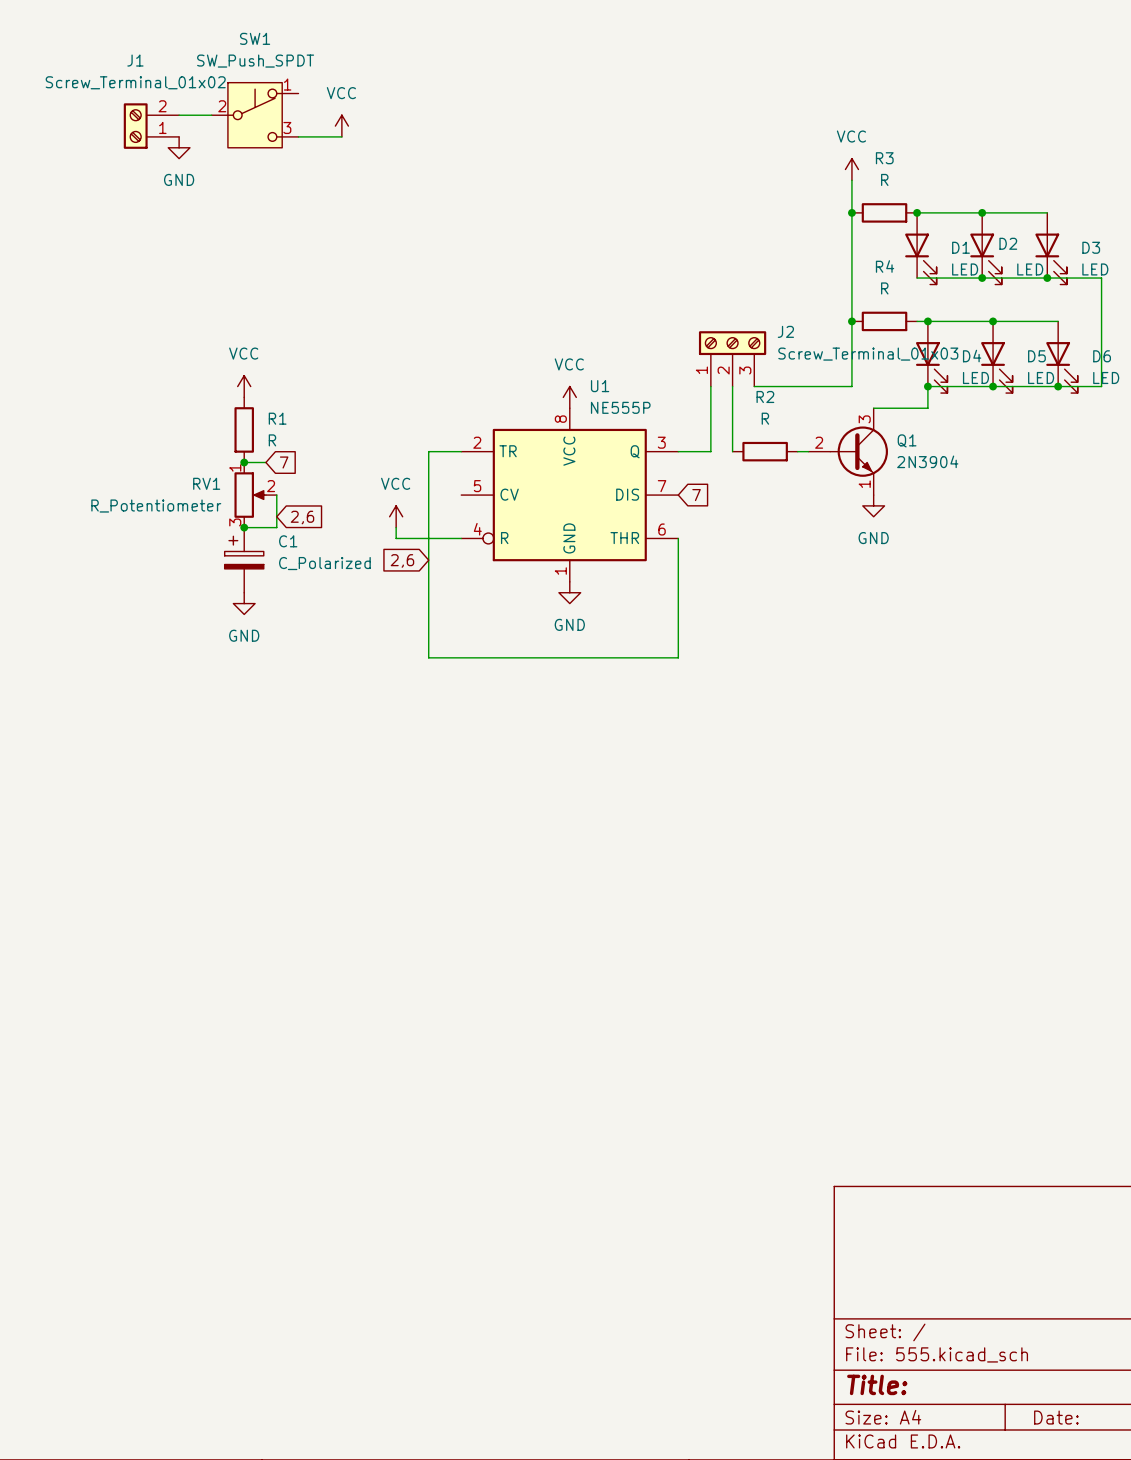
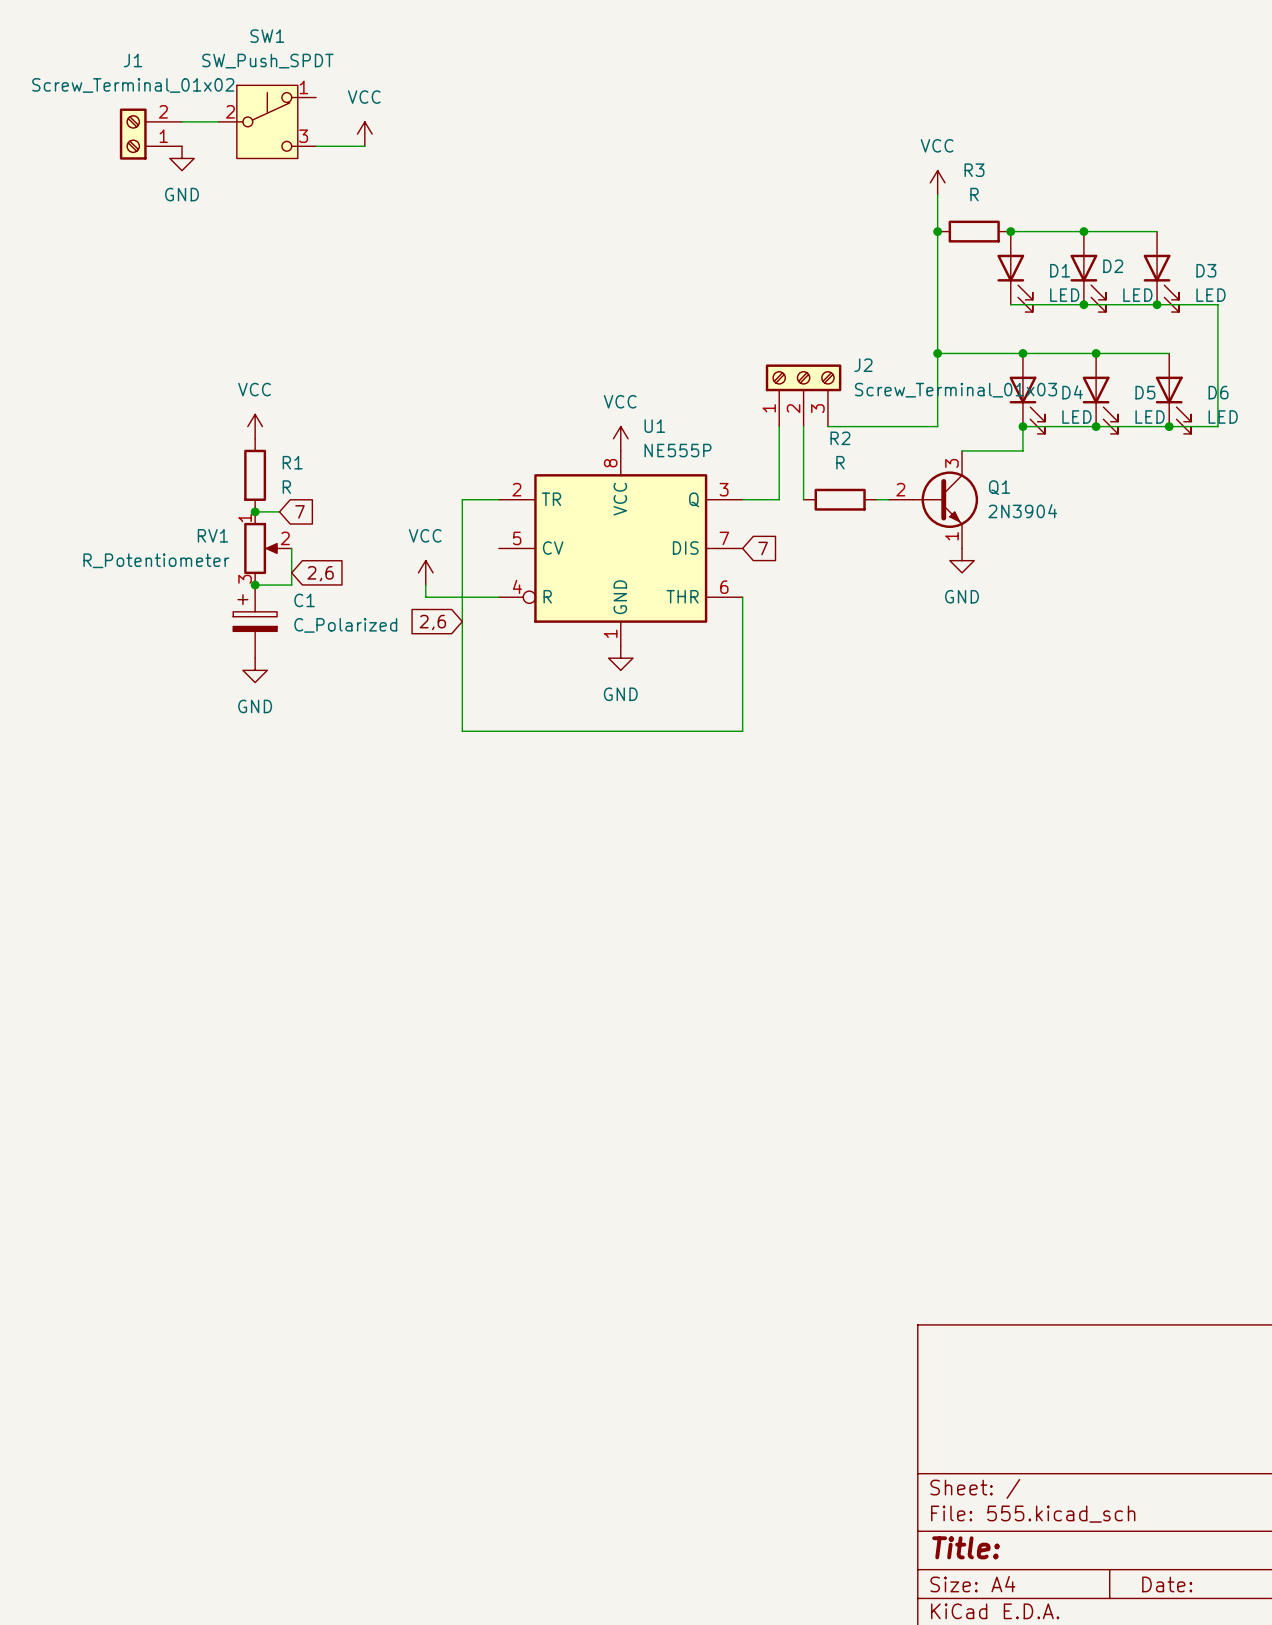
wire: none -> (937, 353) (1010, 353)
R4: R (884, 321) -> none

